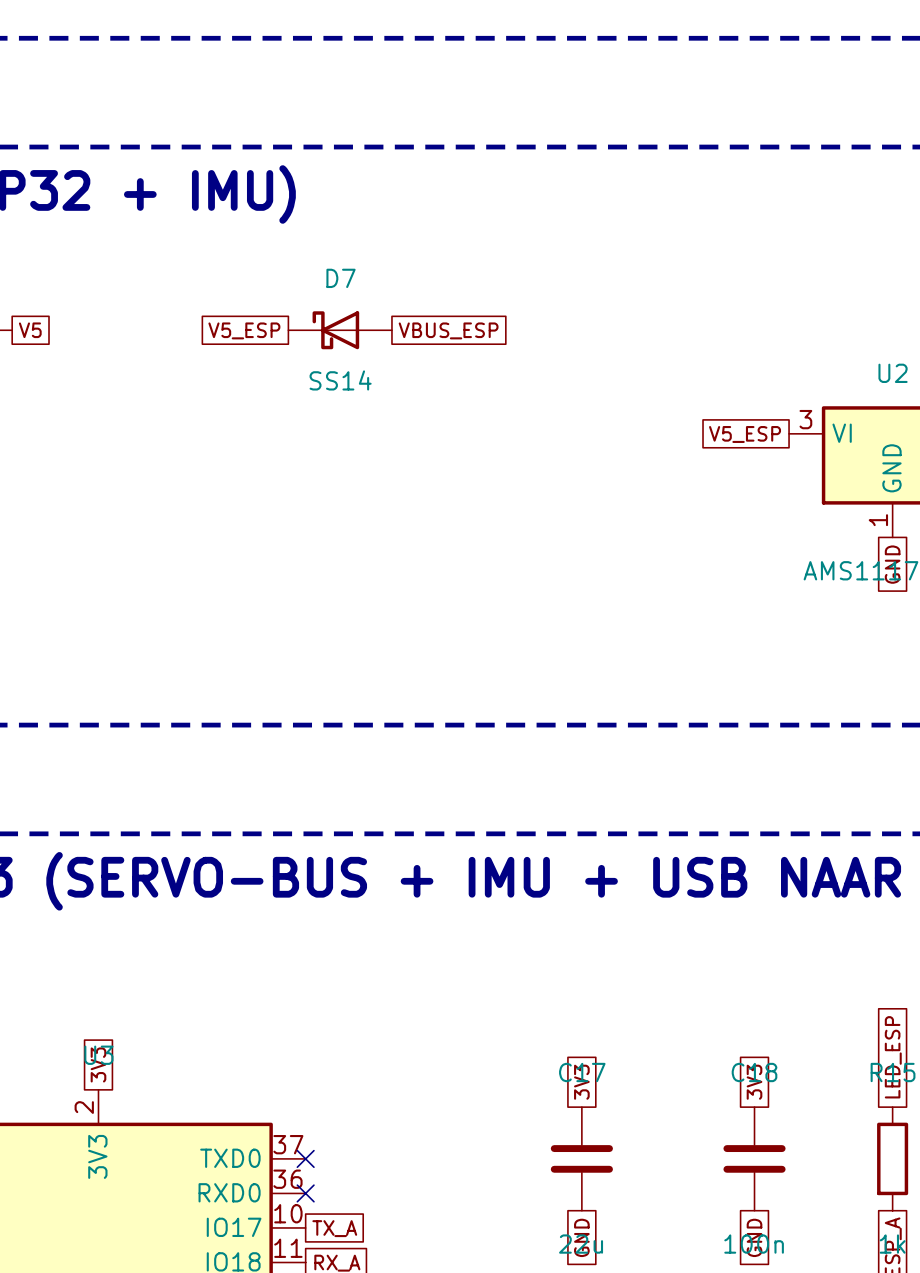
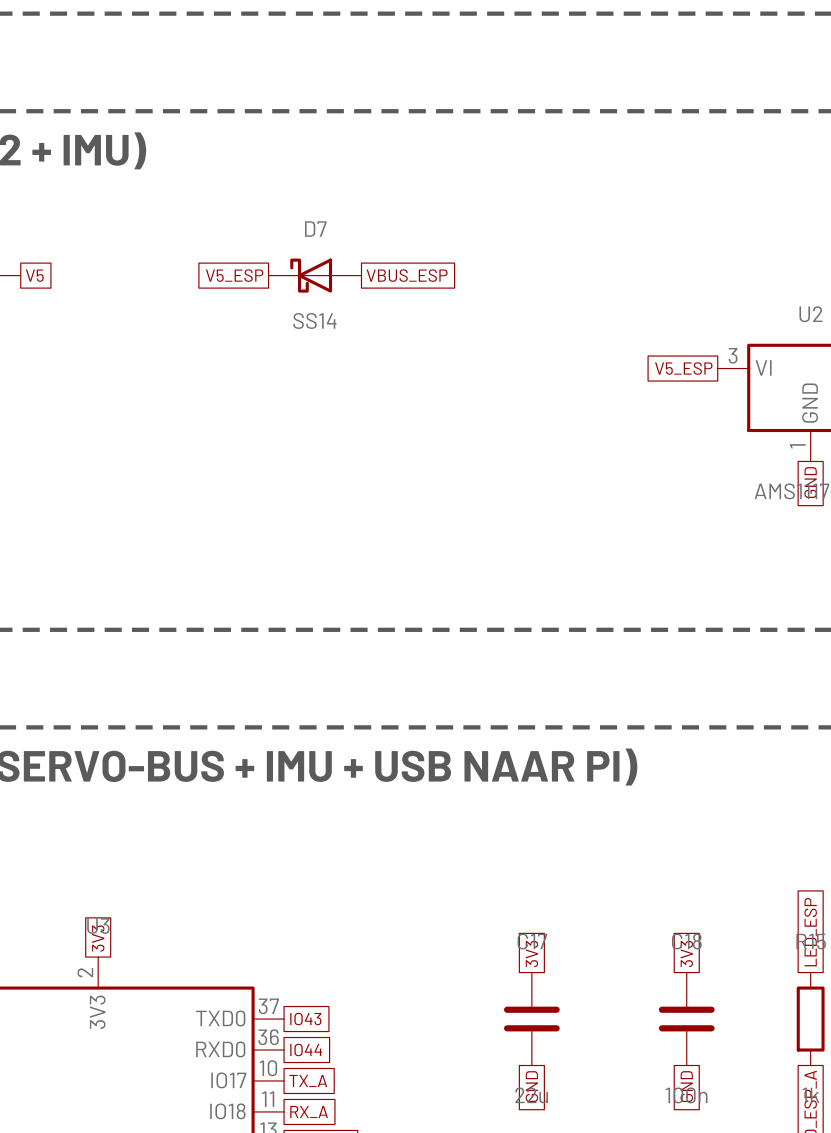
no-connect mark: (305, 1158) -> none
global label: none -> IO43 (305, 1019)
no-connect mark: (305, 1193) -> none
global label: none -> IO44 (306, 1050)

